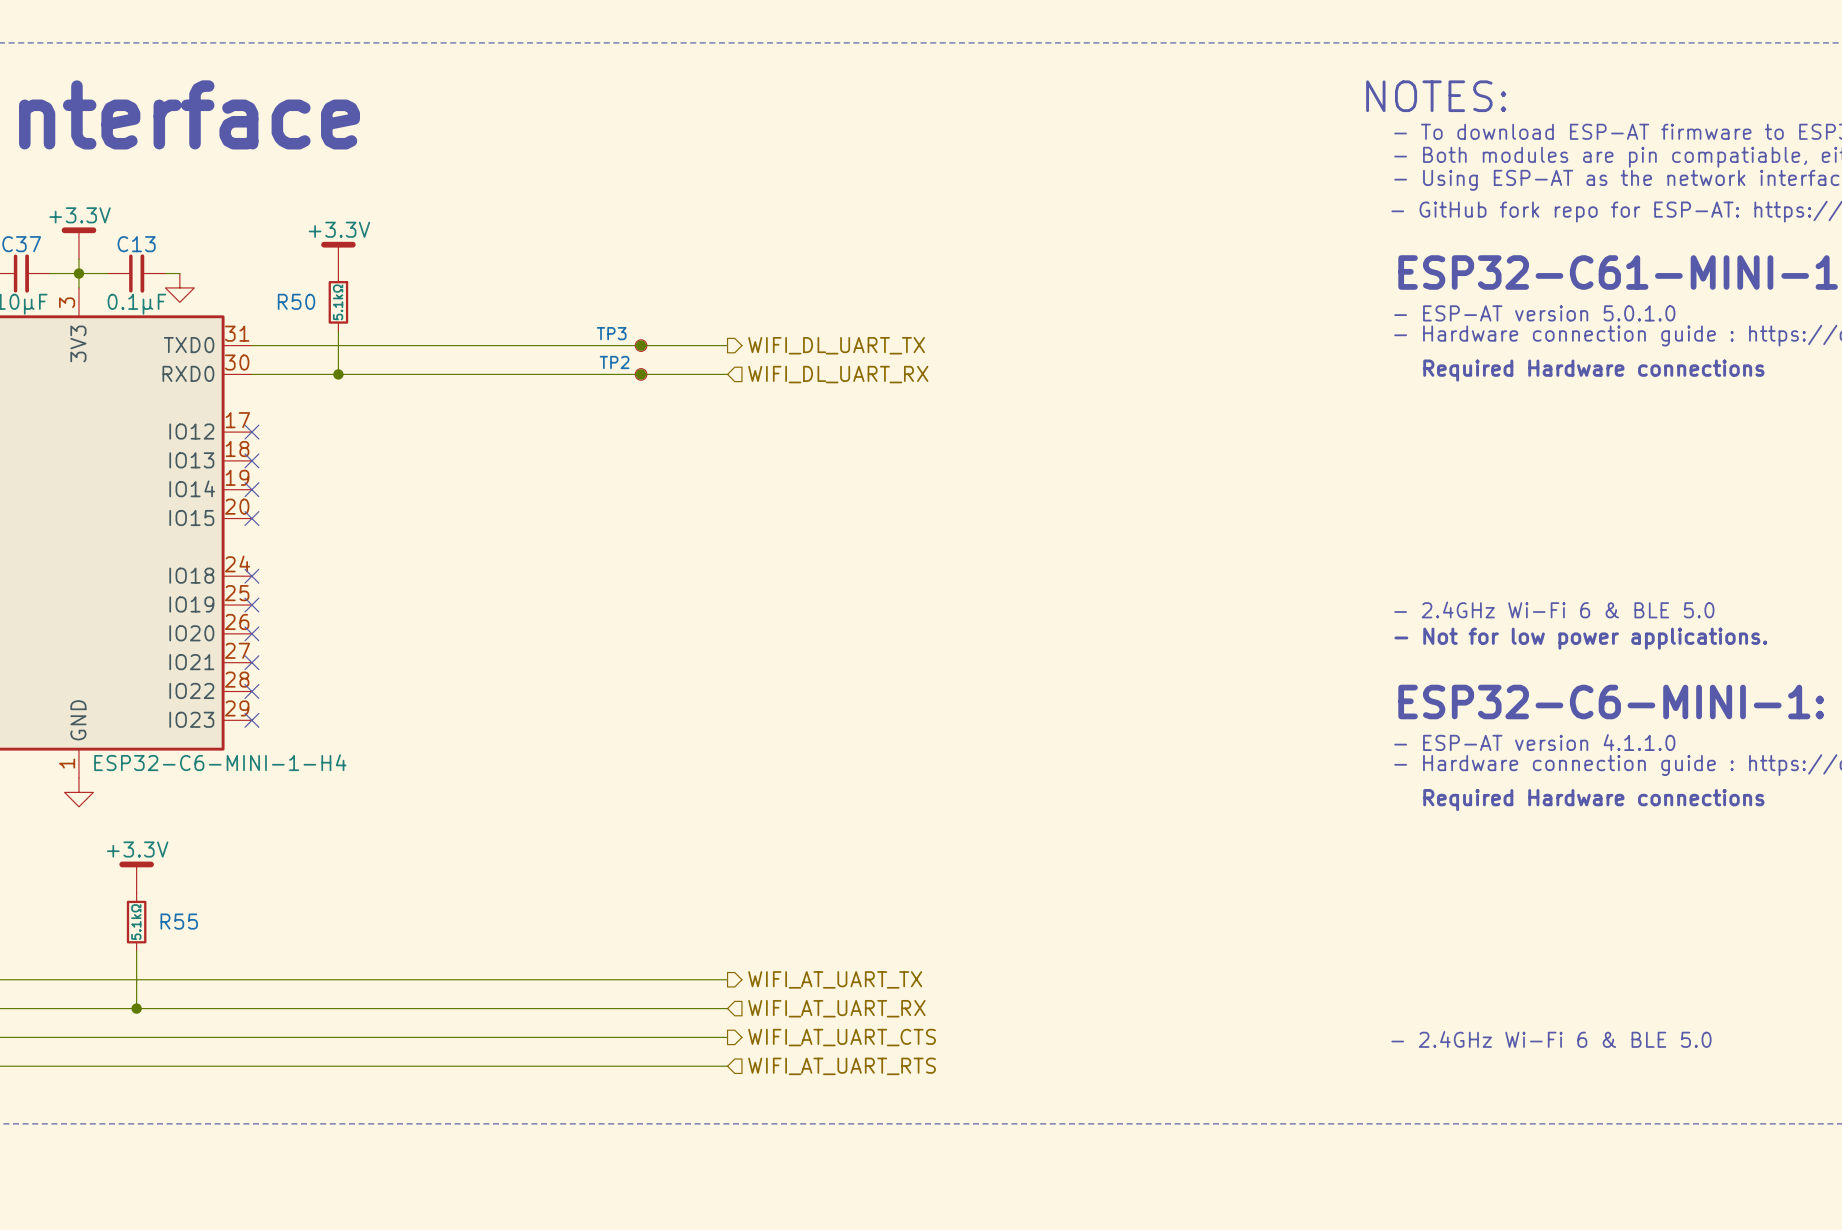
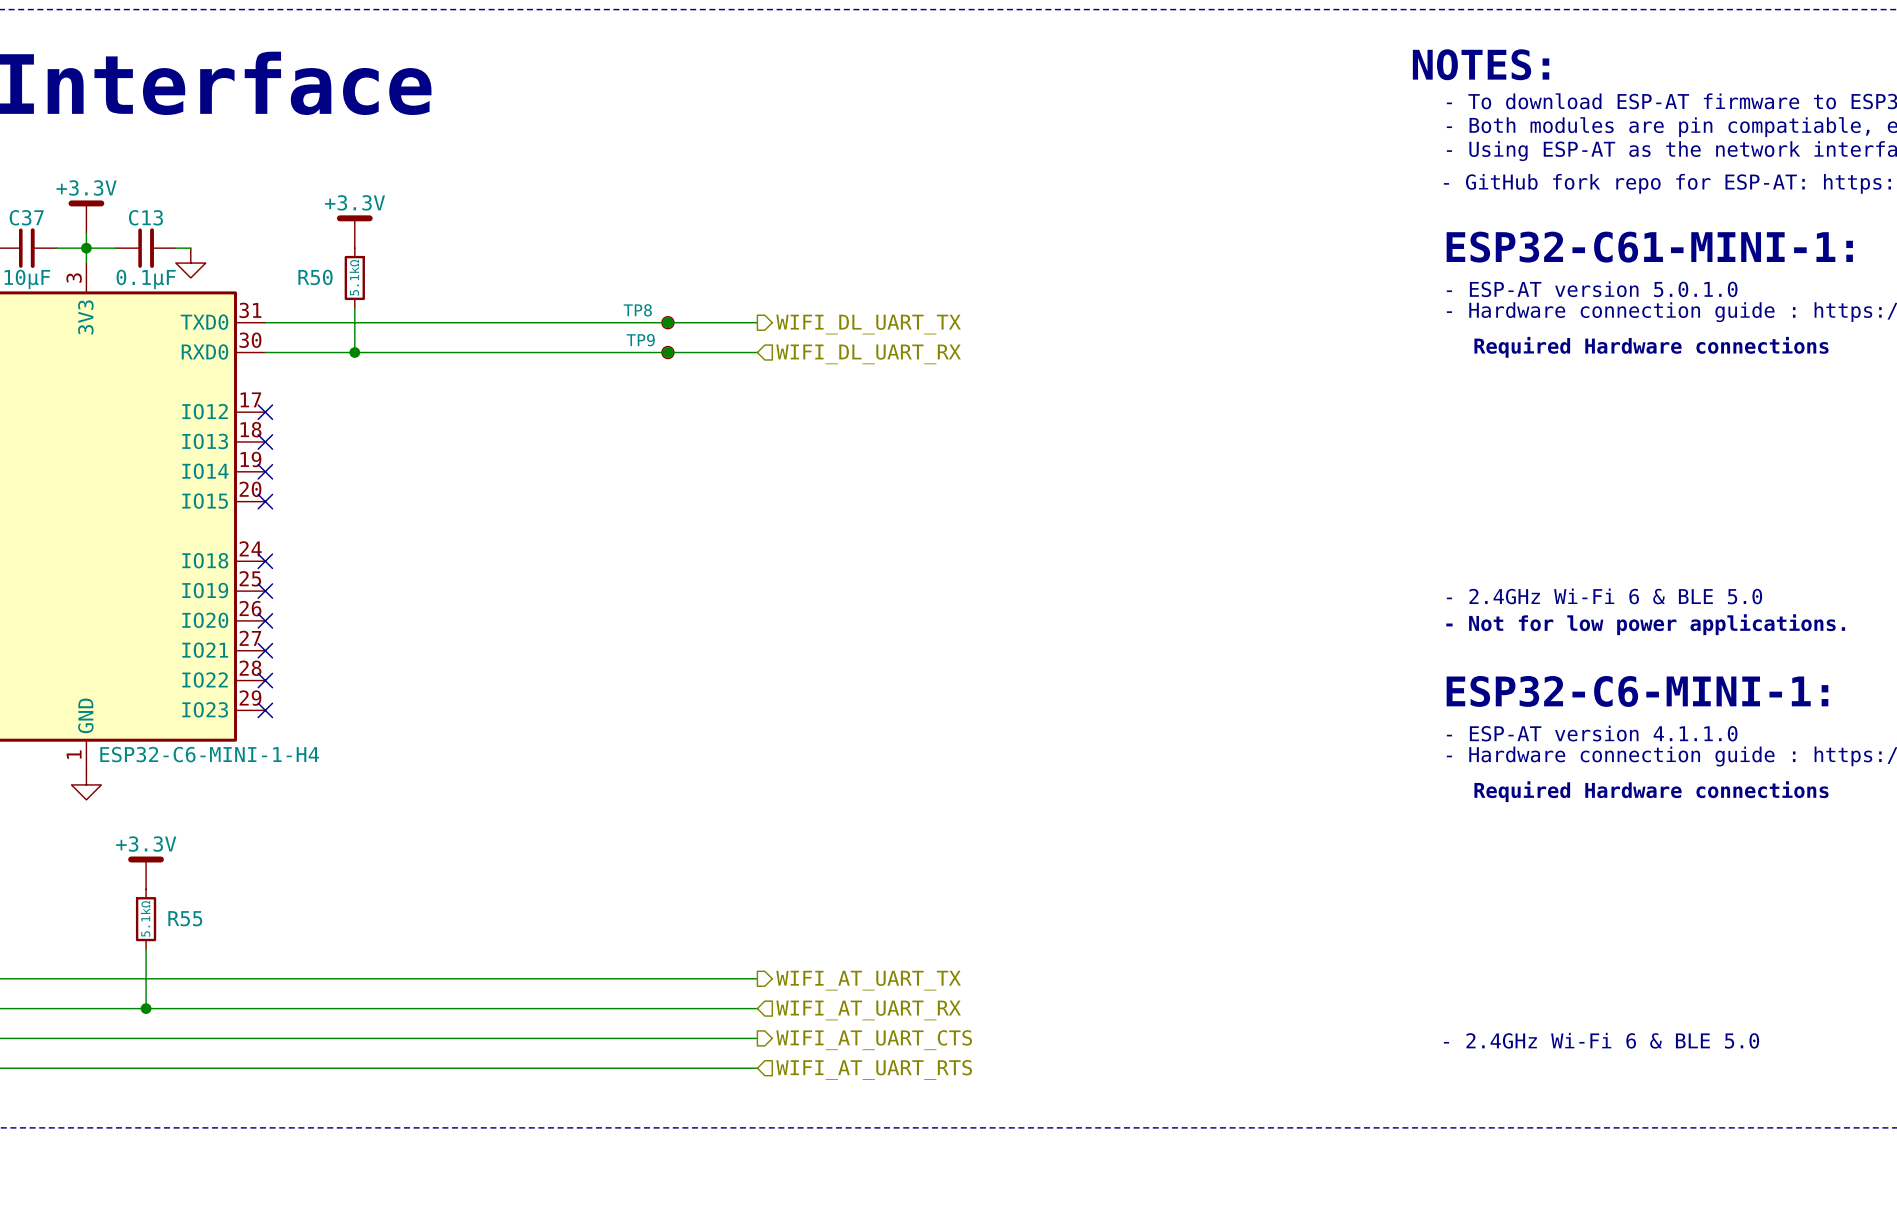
TP3 name: TP3 (611, 333) -> TP8 (637, 310)
TP2 name: TP2 (614, 362) -> TP9 (640, 340)

